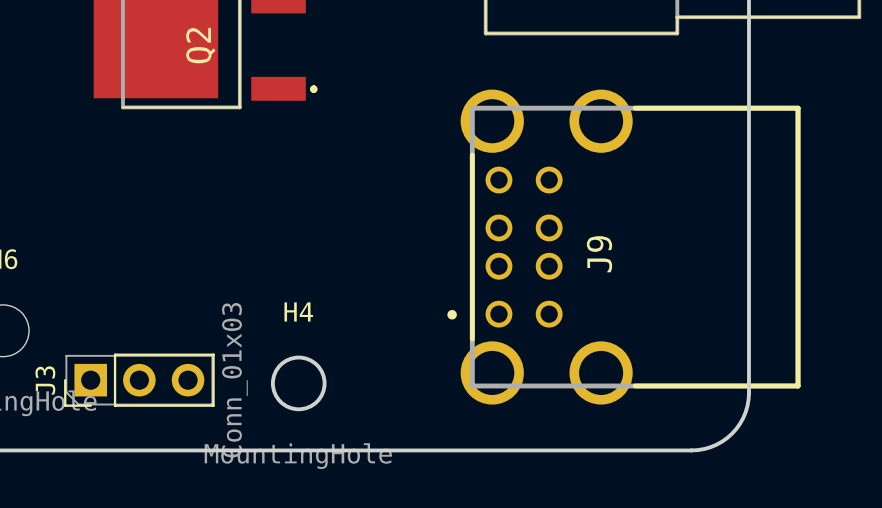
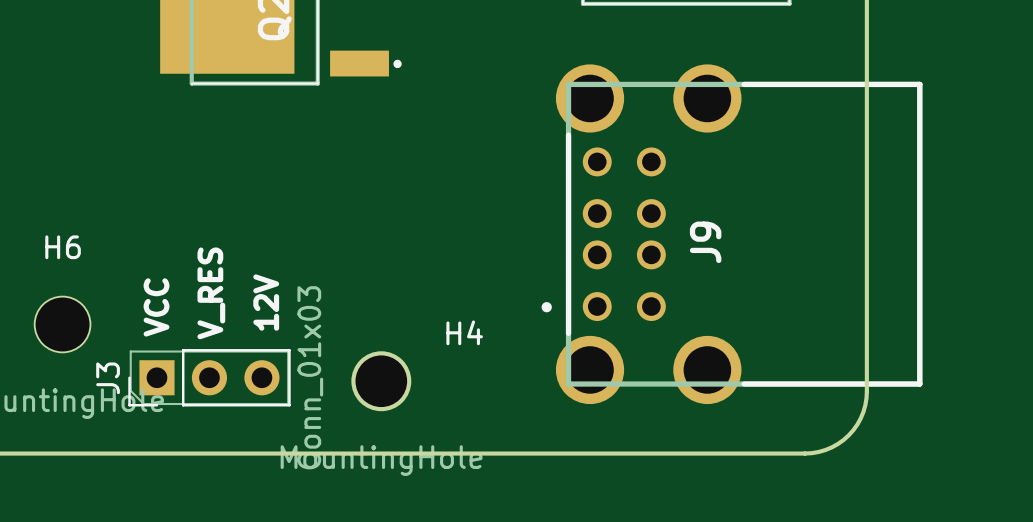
text: none -> V_RES (211, 293)
text: none -> 12V (266, 302)
H4 name position: H4 (298, 311) -> H4 (464, 332)
text: none -> VCC (156, 307)

